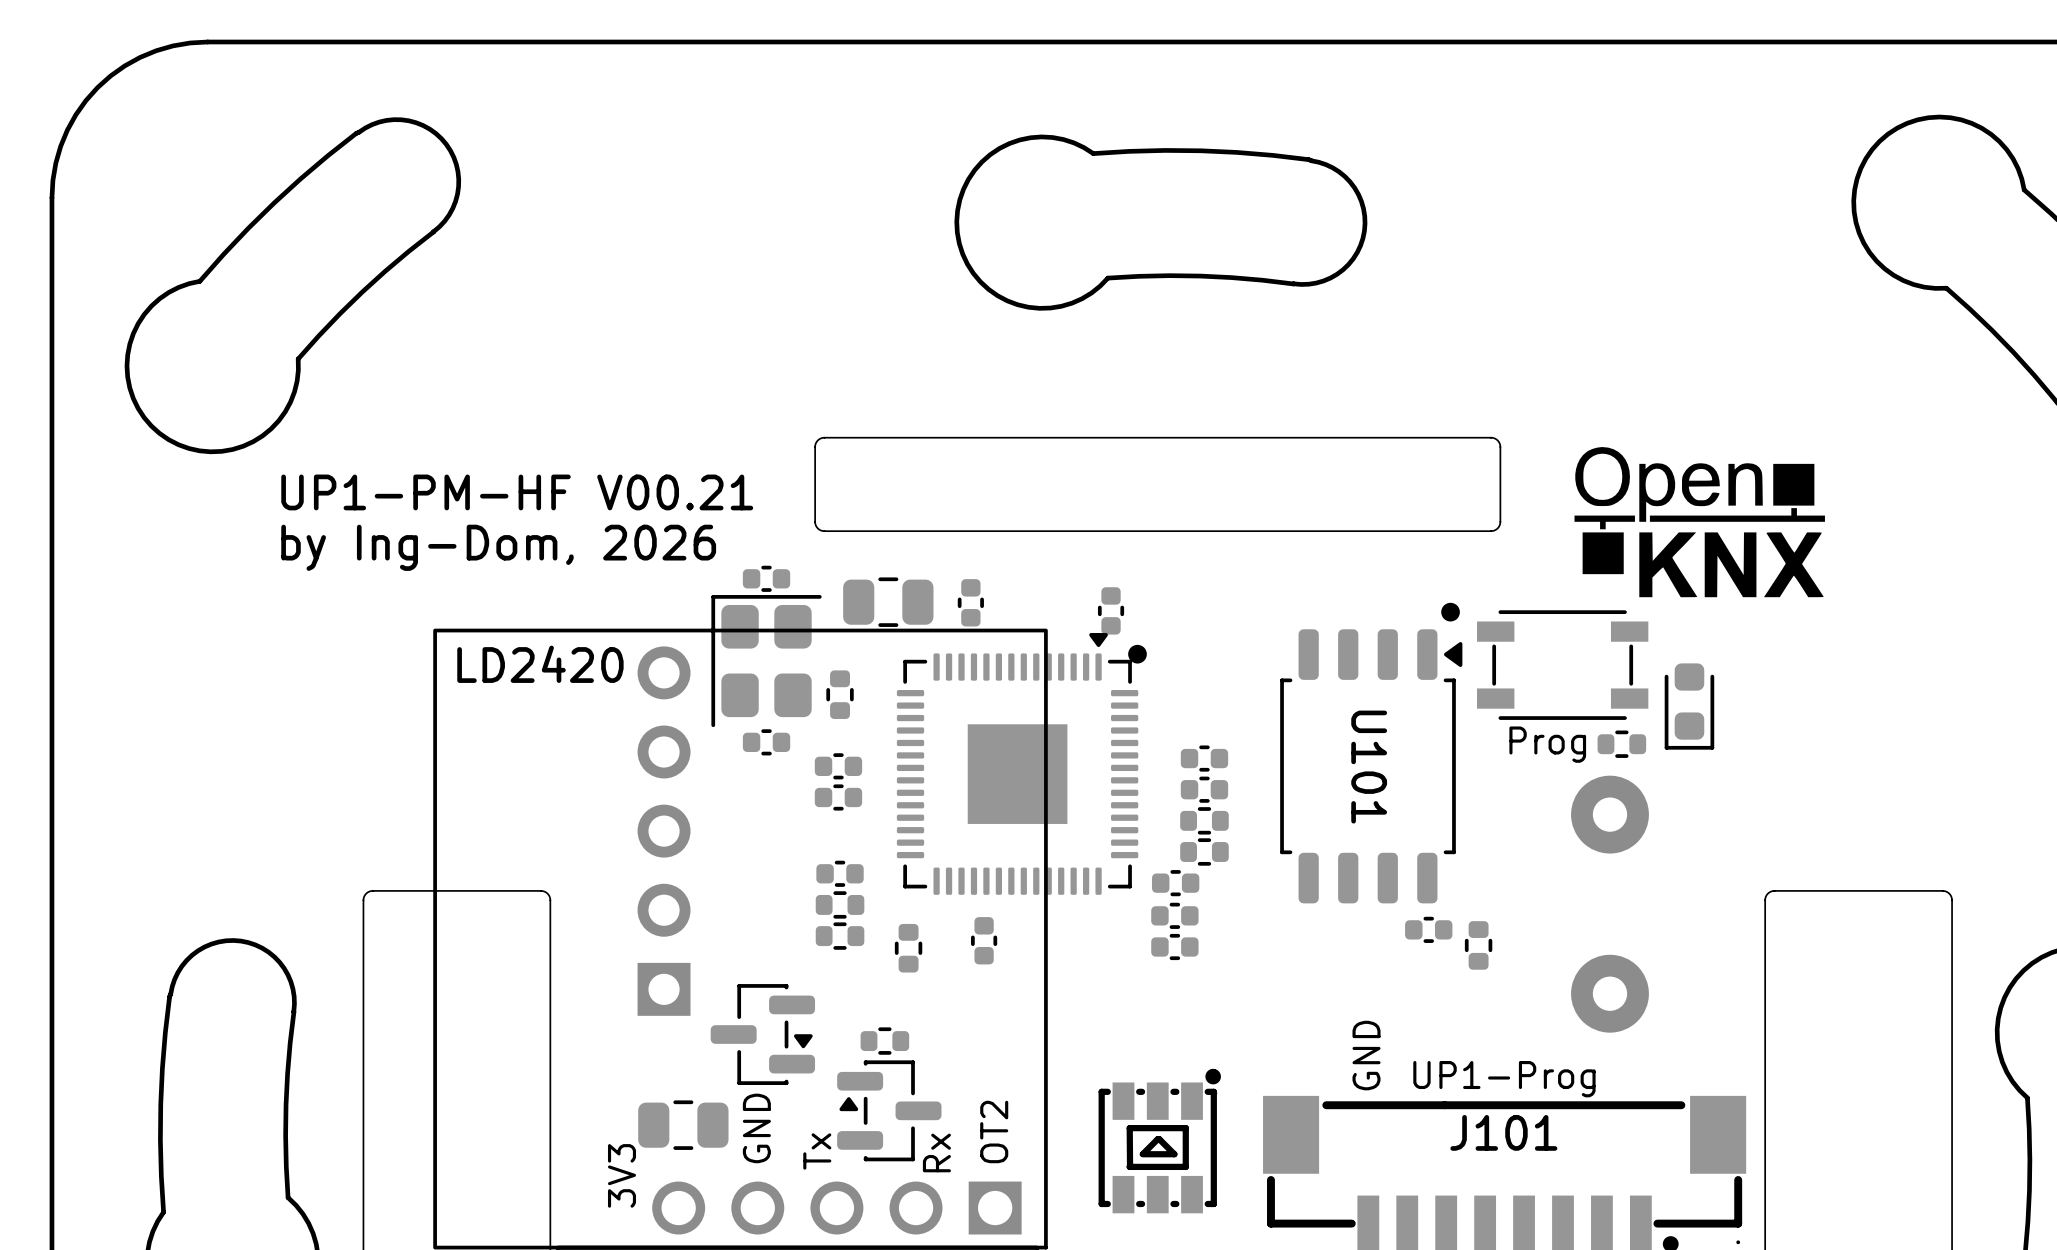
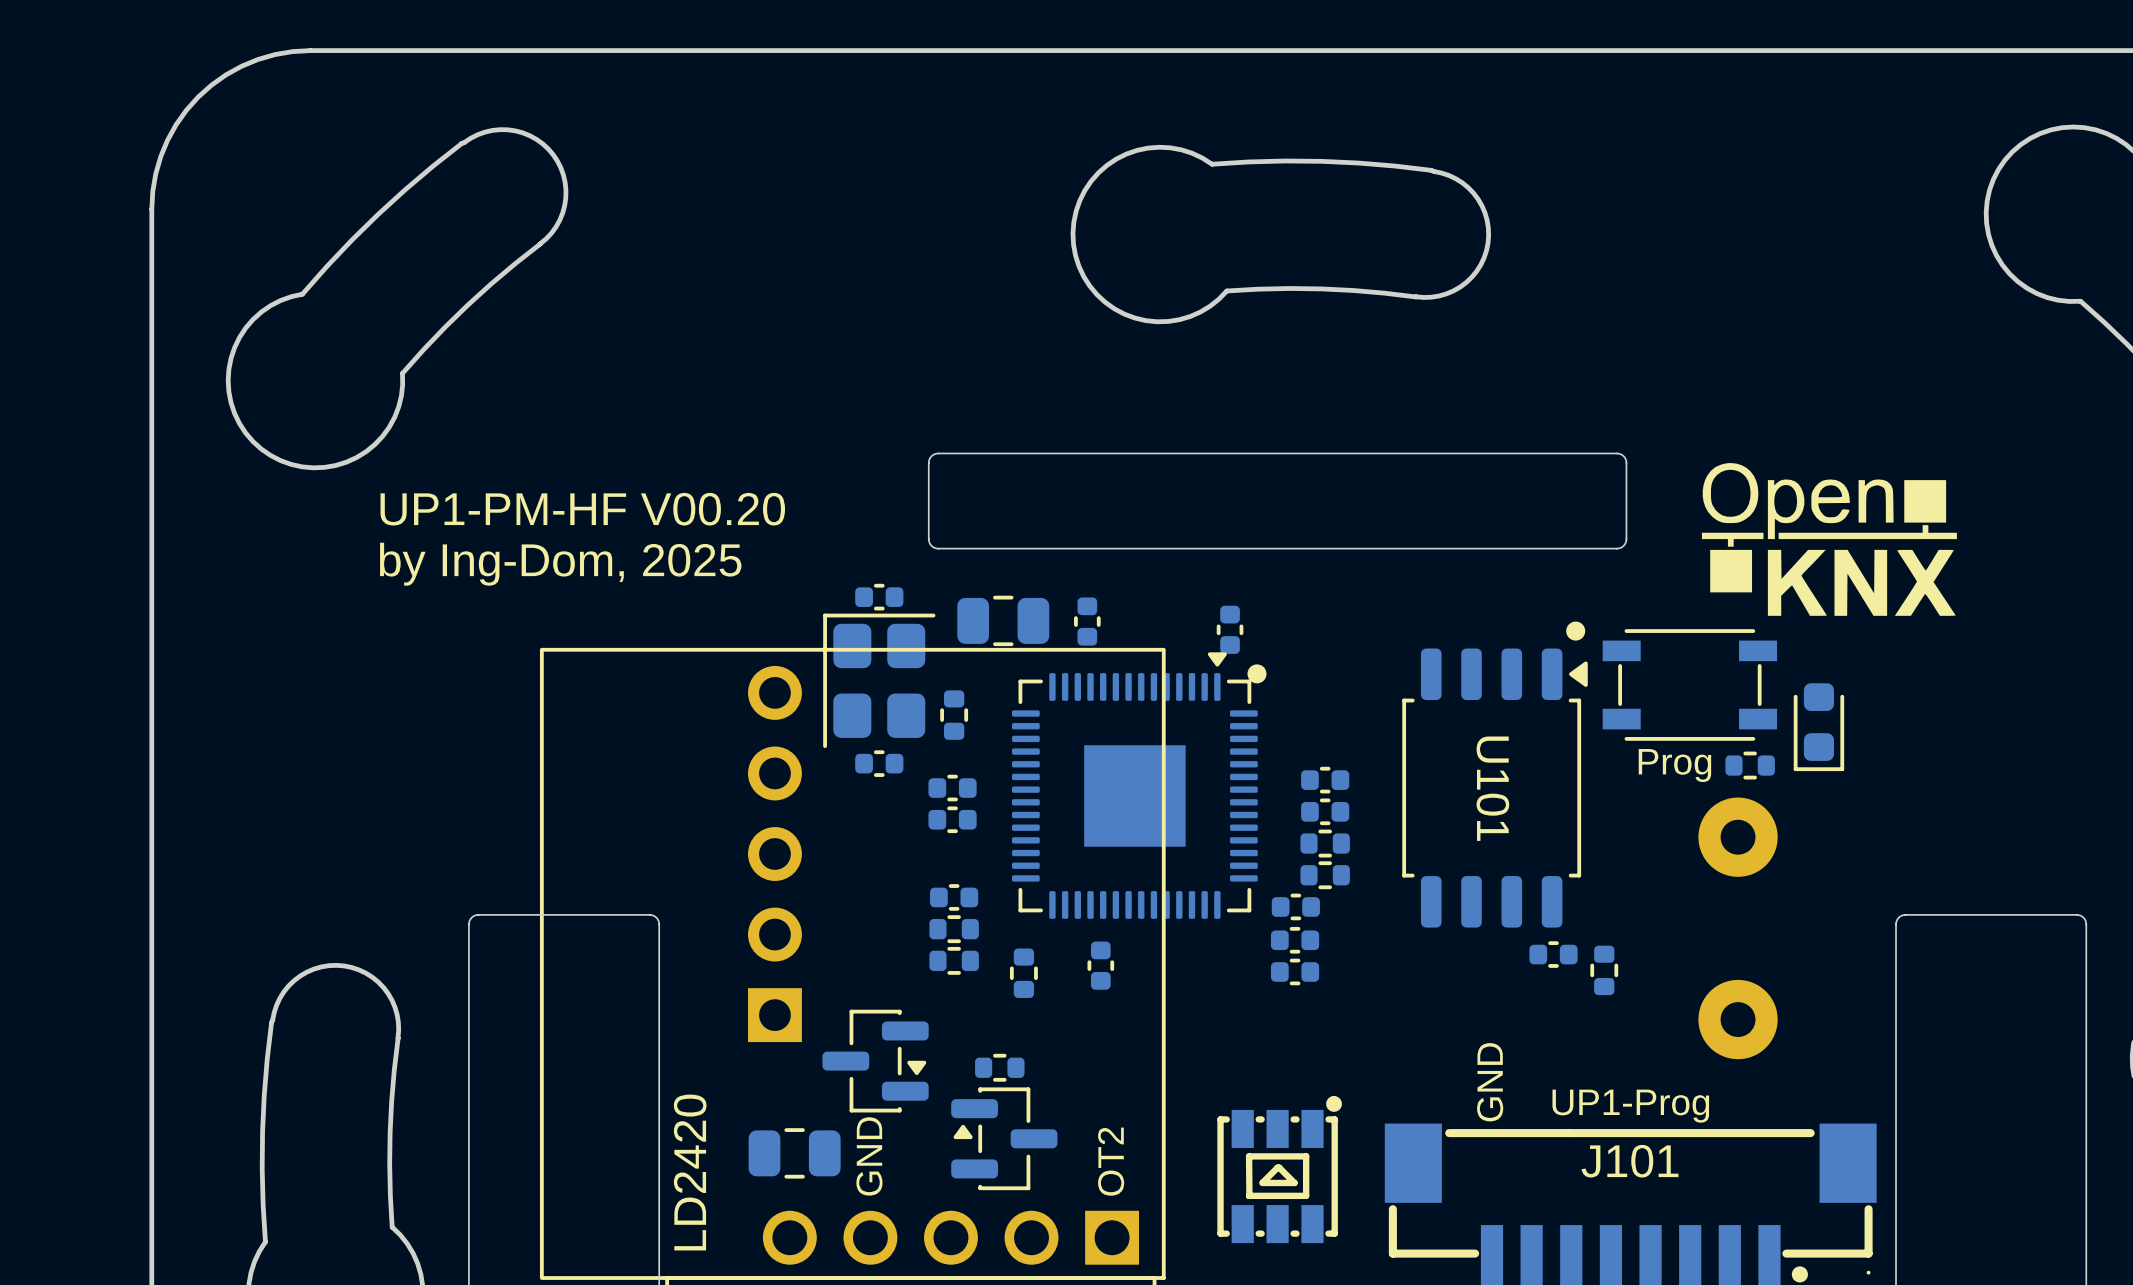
text: UP1-PM-HF V00.21 (517, 492) -> UP1-PM-HF V00.20 (582, 509)
text: by Ing-Dom, 2026 (498, 547) -> by Ing-Dom, 2025 (560, 564)
part text rotation: 0° (540, 664) -> 90° counterclockwise (690, 1172)
part text position: LD2420 (540, 664) -> LD2420 (690, 1172)
part text: Tx (817, 1151) -> none
part text: Rx (936, 1152) -> none
part text: 3V3 (621, 1175) -> none

